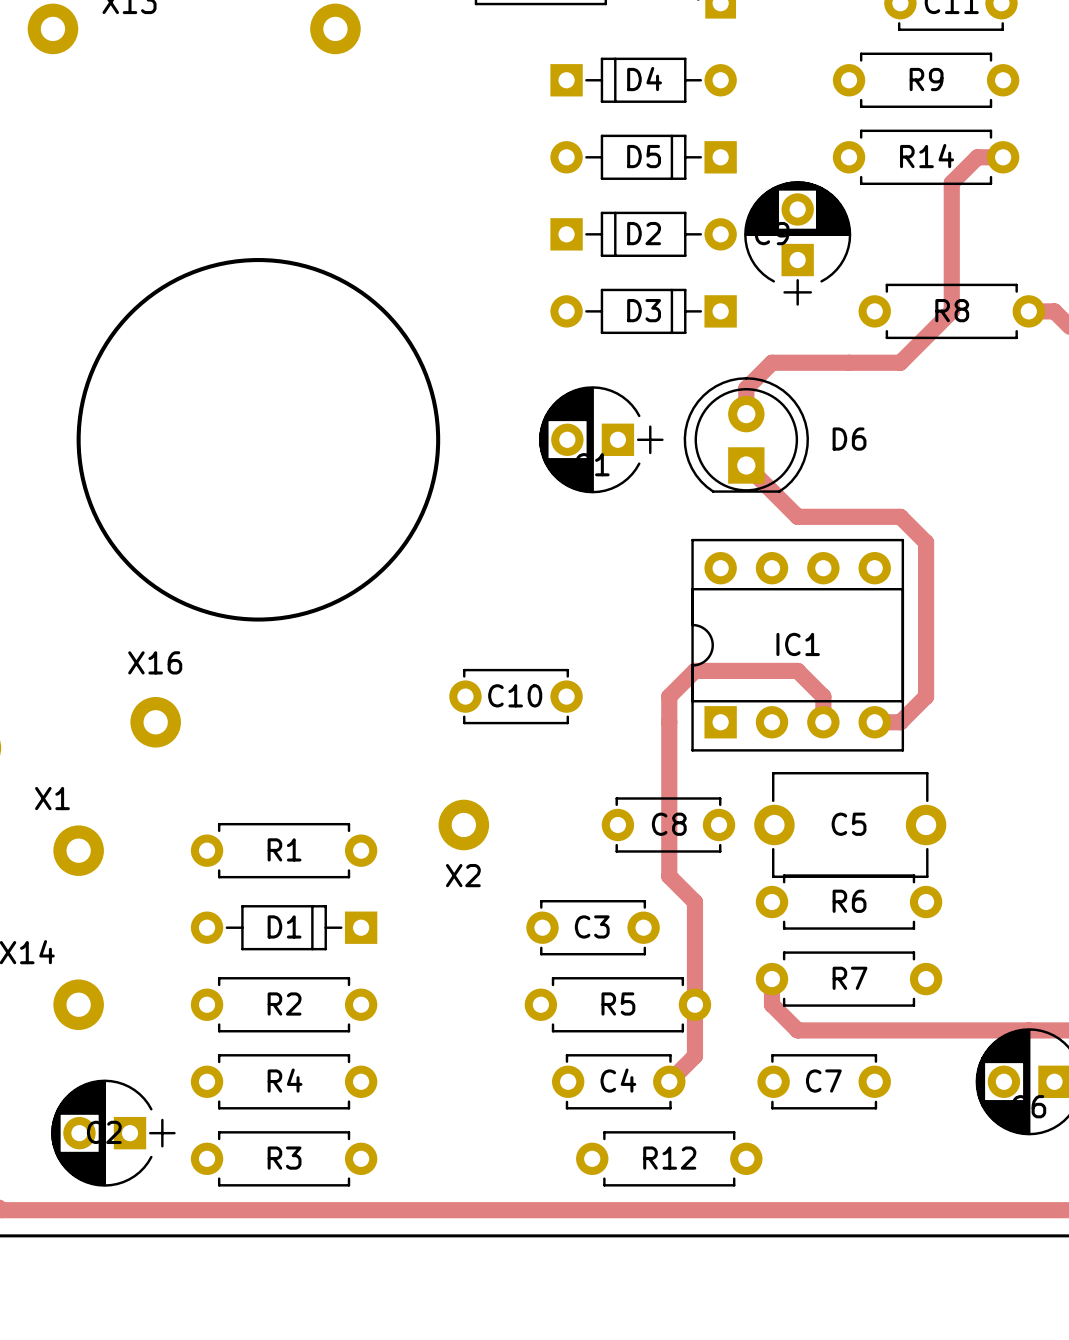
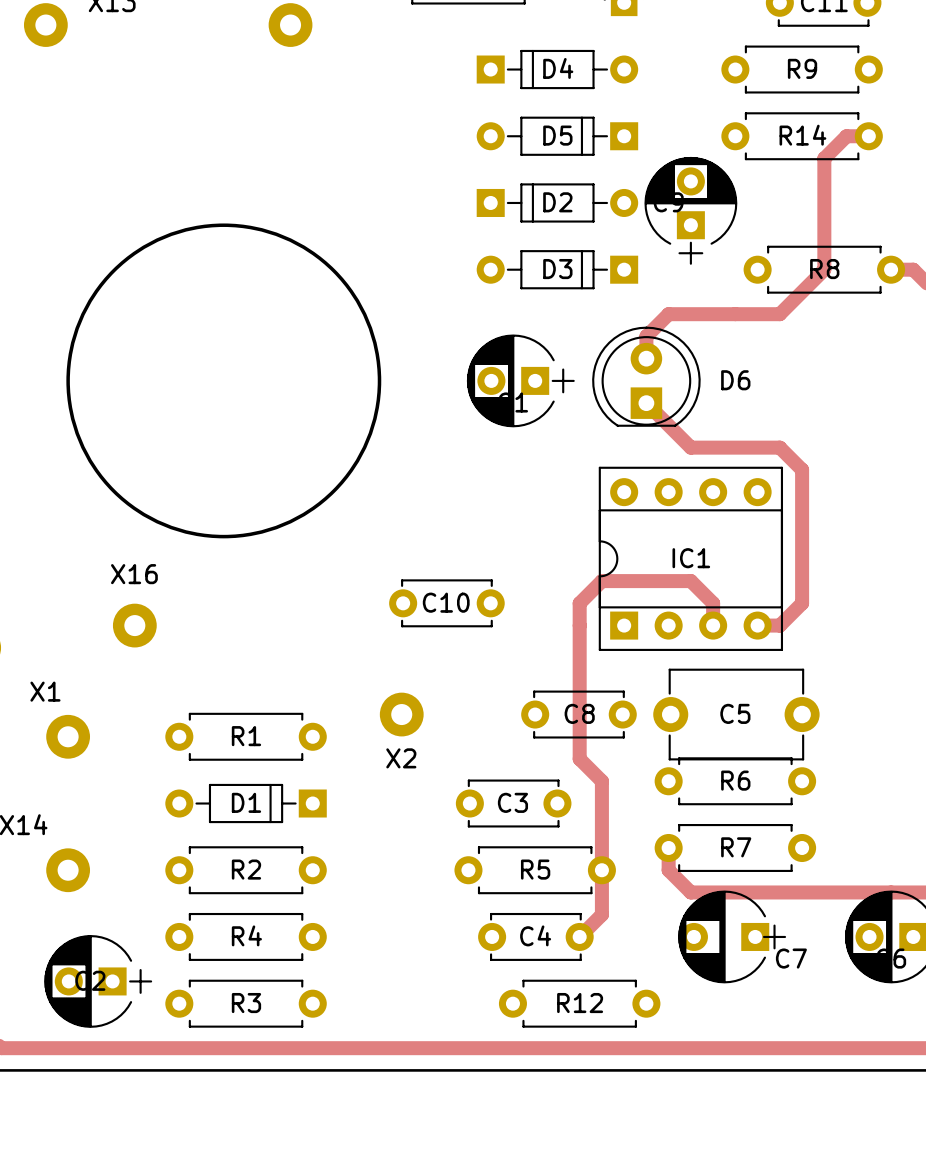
C7 footprint: [757, 1054, 891, 1110] -> [678, 890, 787, 984]
C7 name position: C7 (823, 1081) -> C7 (791, 958)

